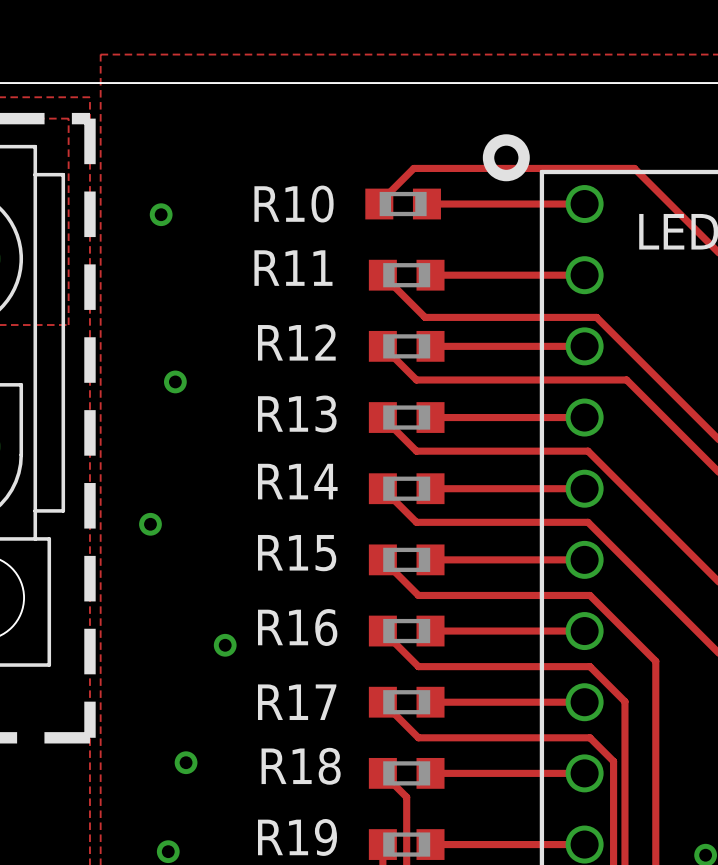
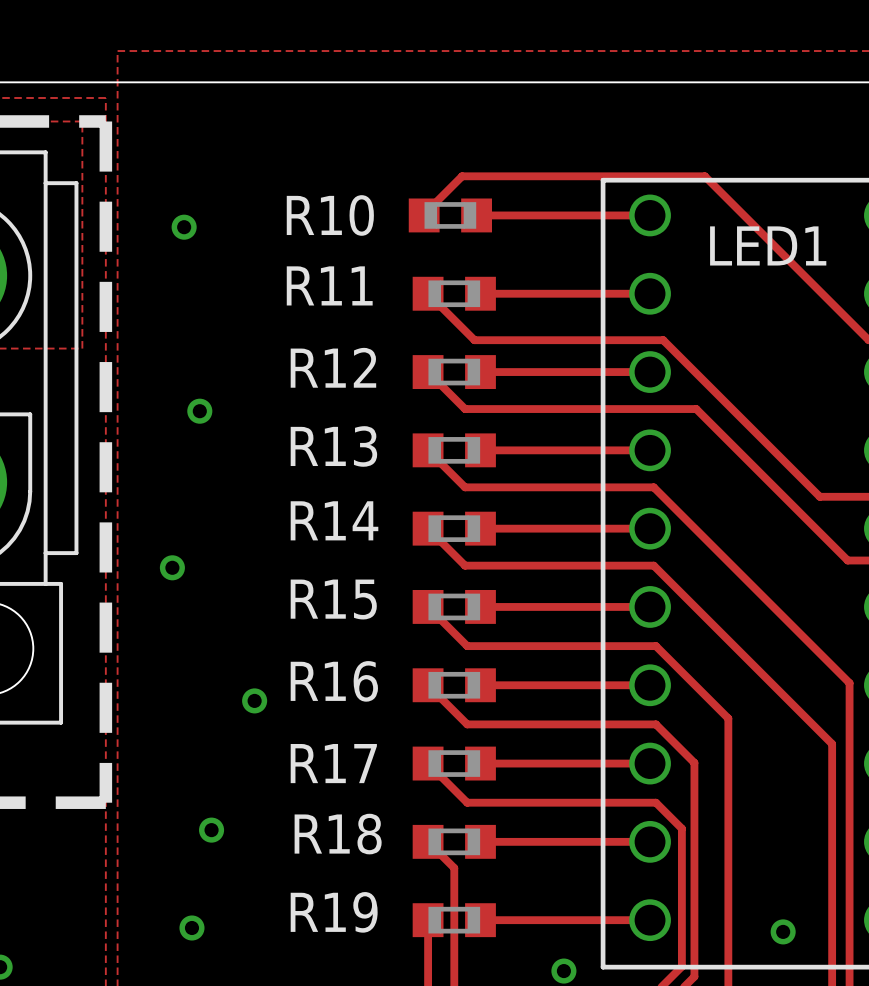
drawing: [482, 134, 530, 182] -> none

